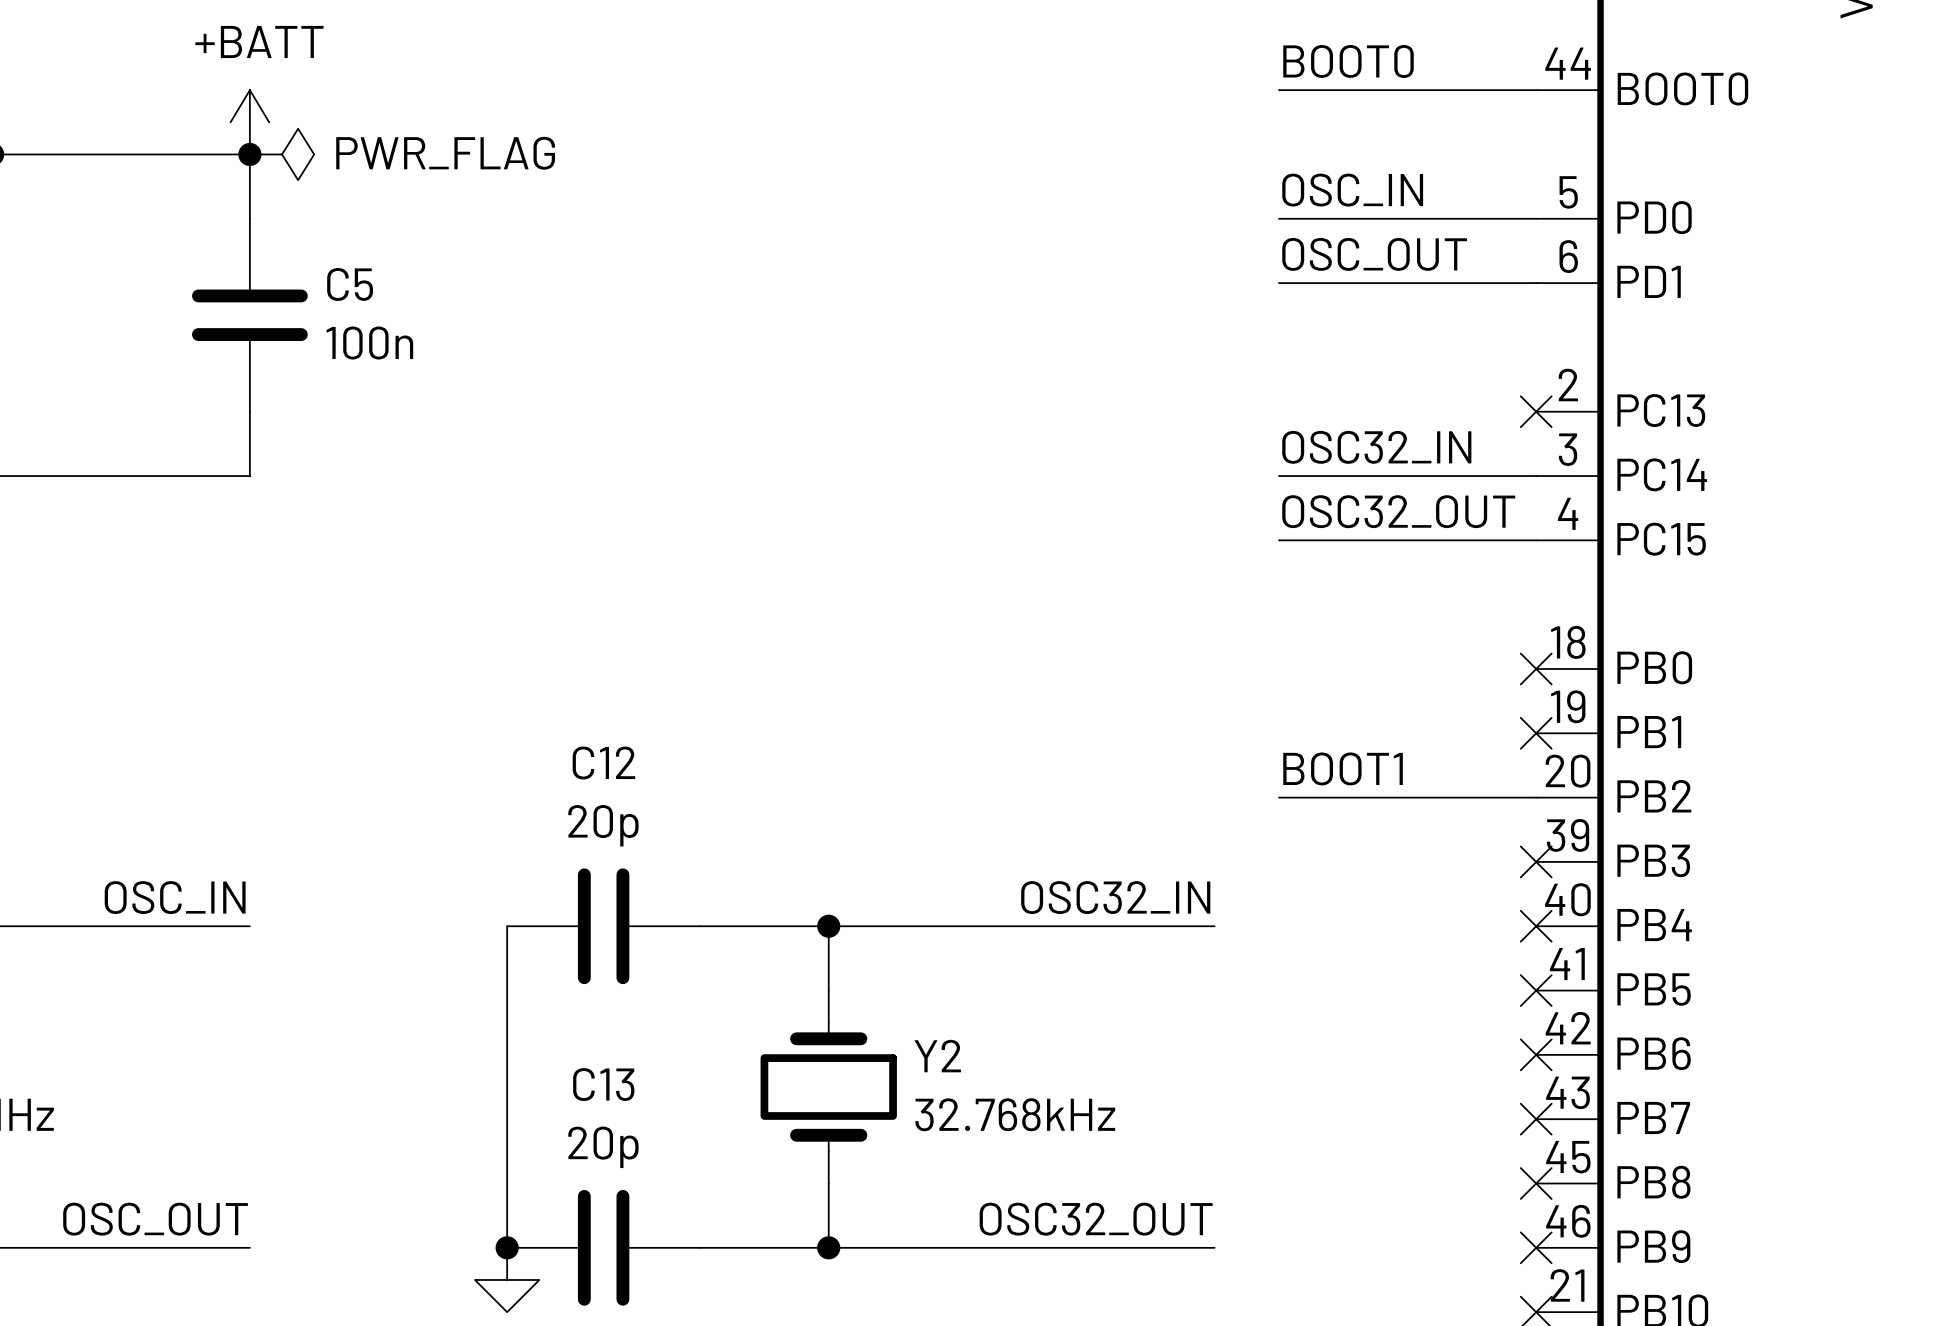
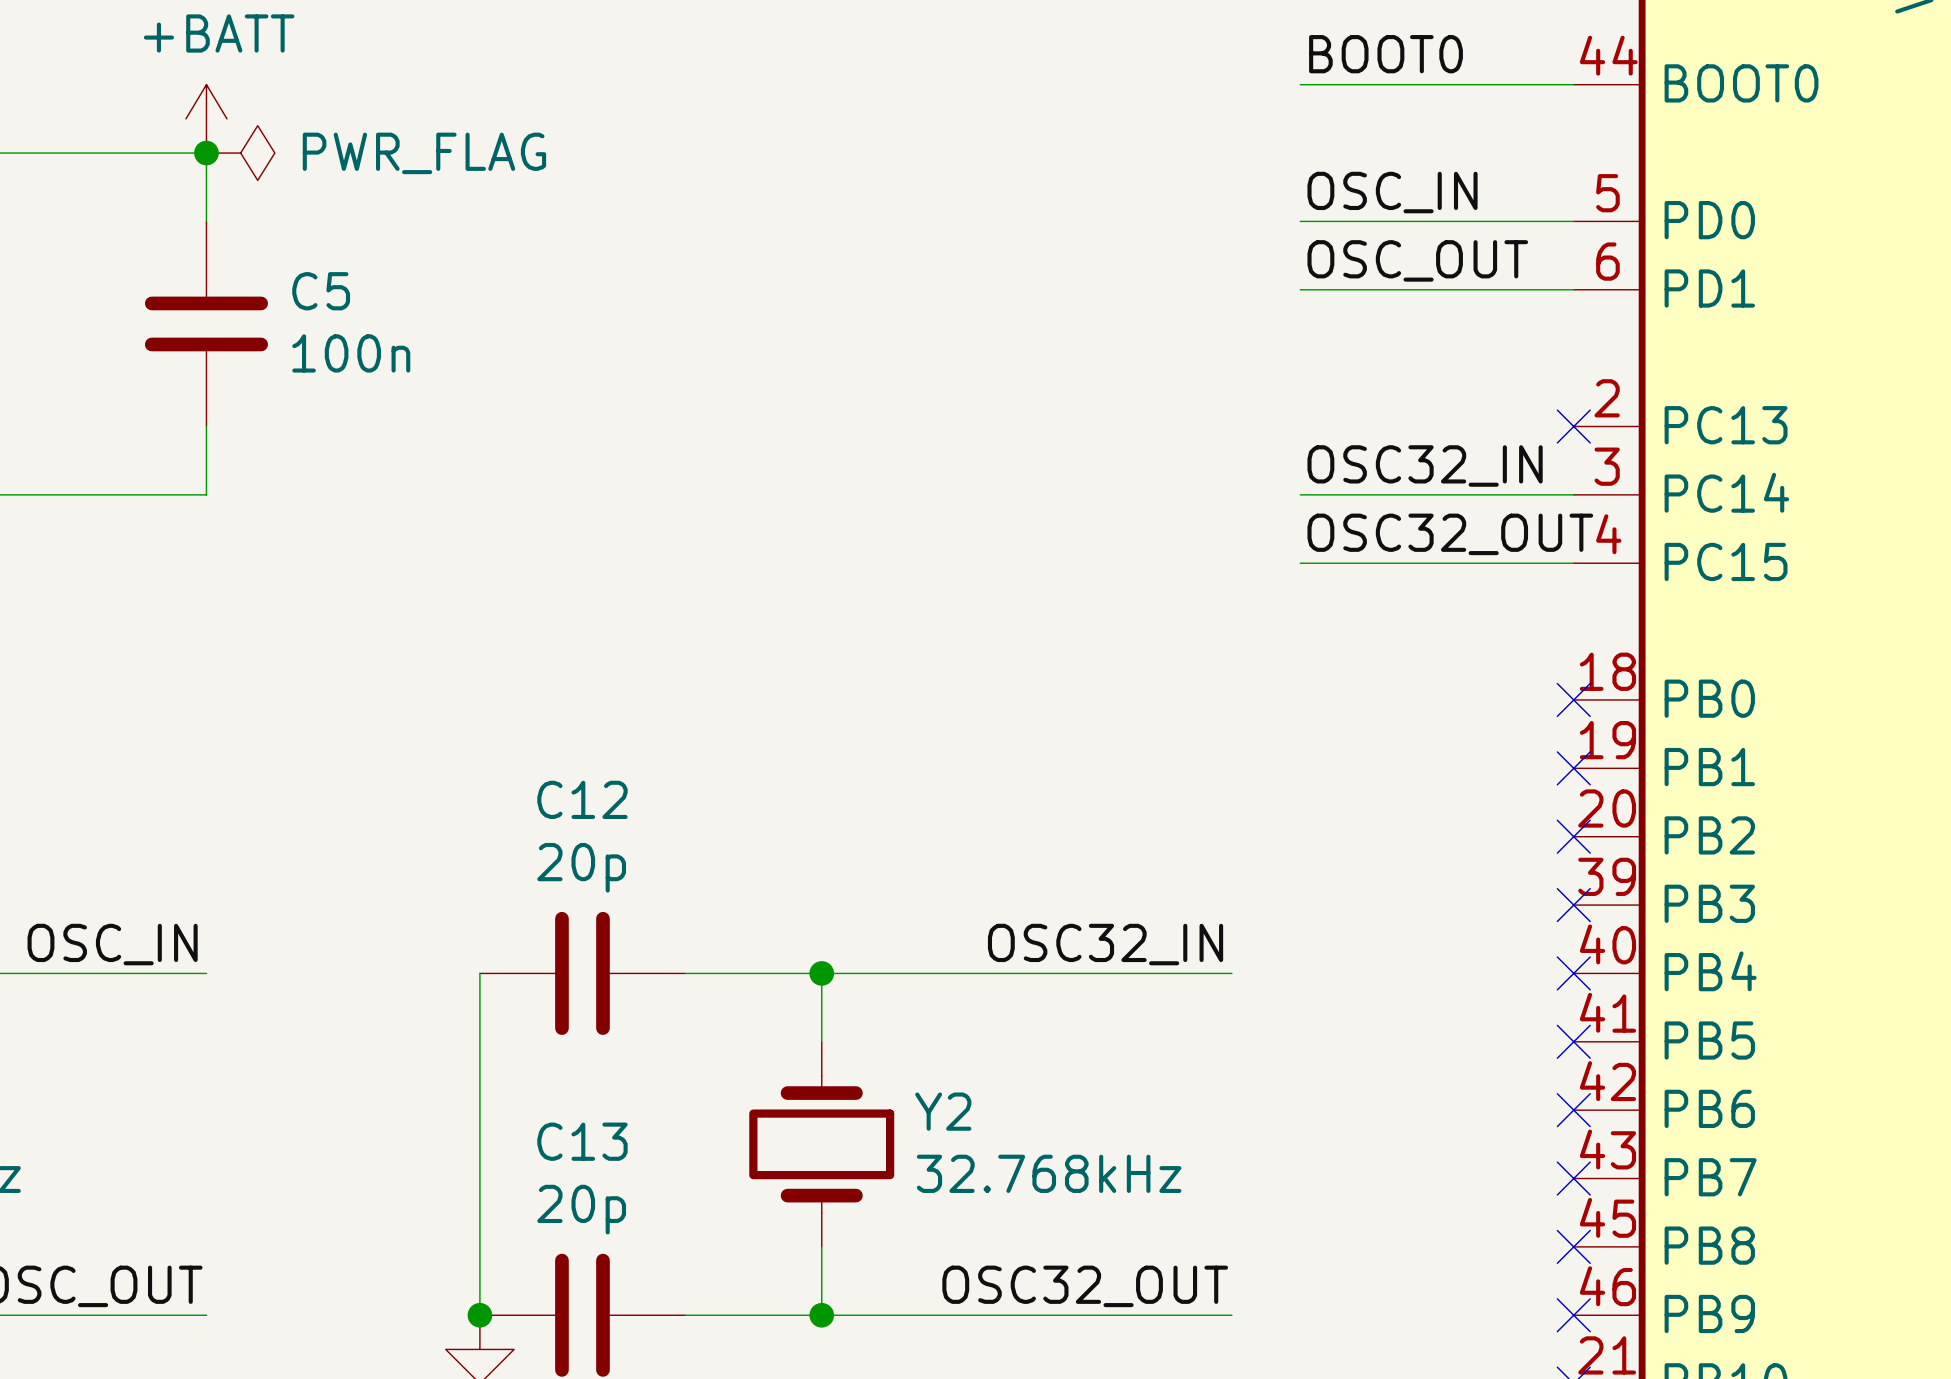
label: BOOT1 (1343, 768) -> none
wire: (1278, 797) (1536, 797) -> none
no-connect mark: none -> (1573, 836)

